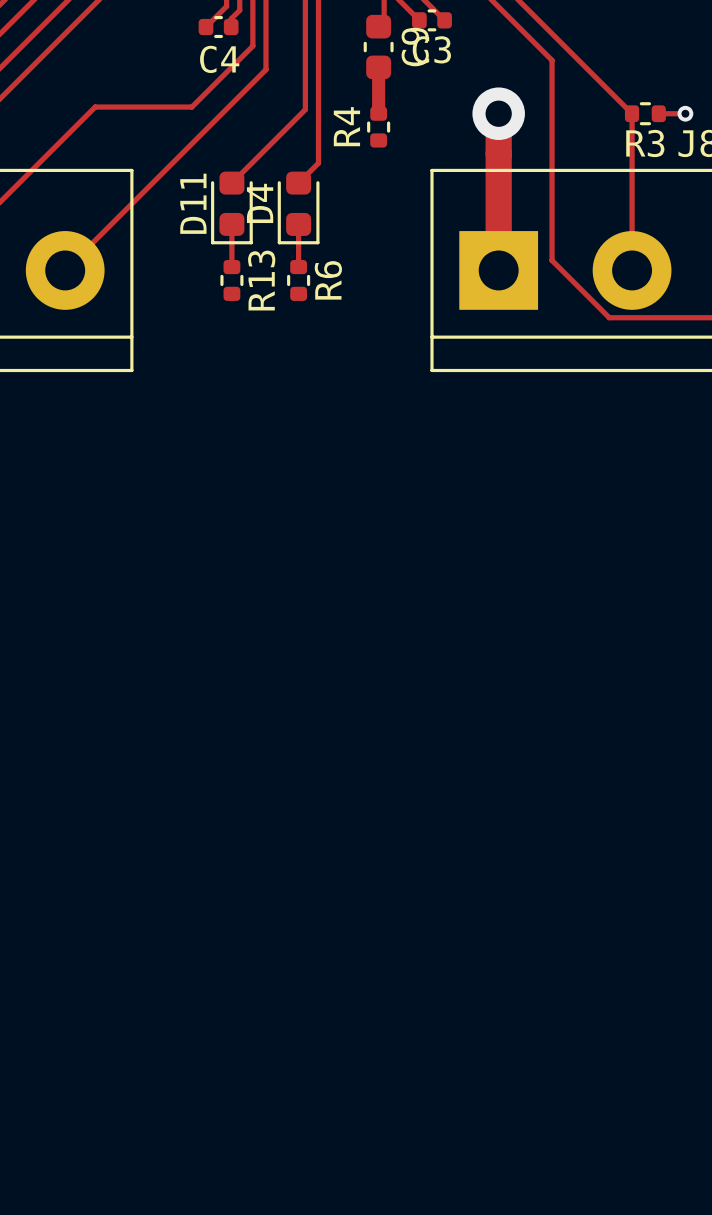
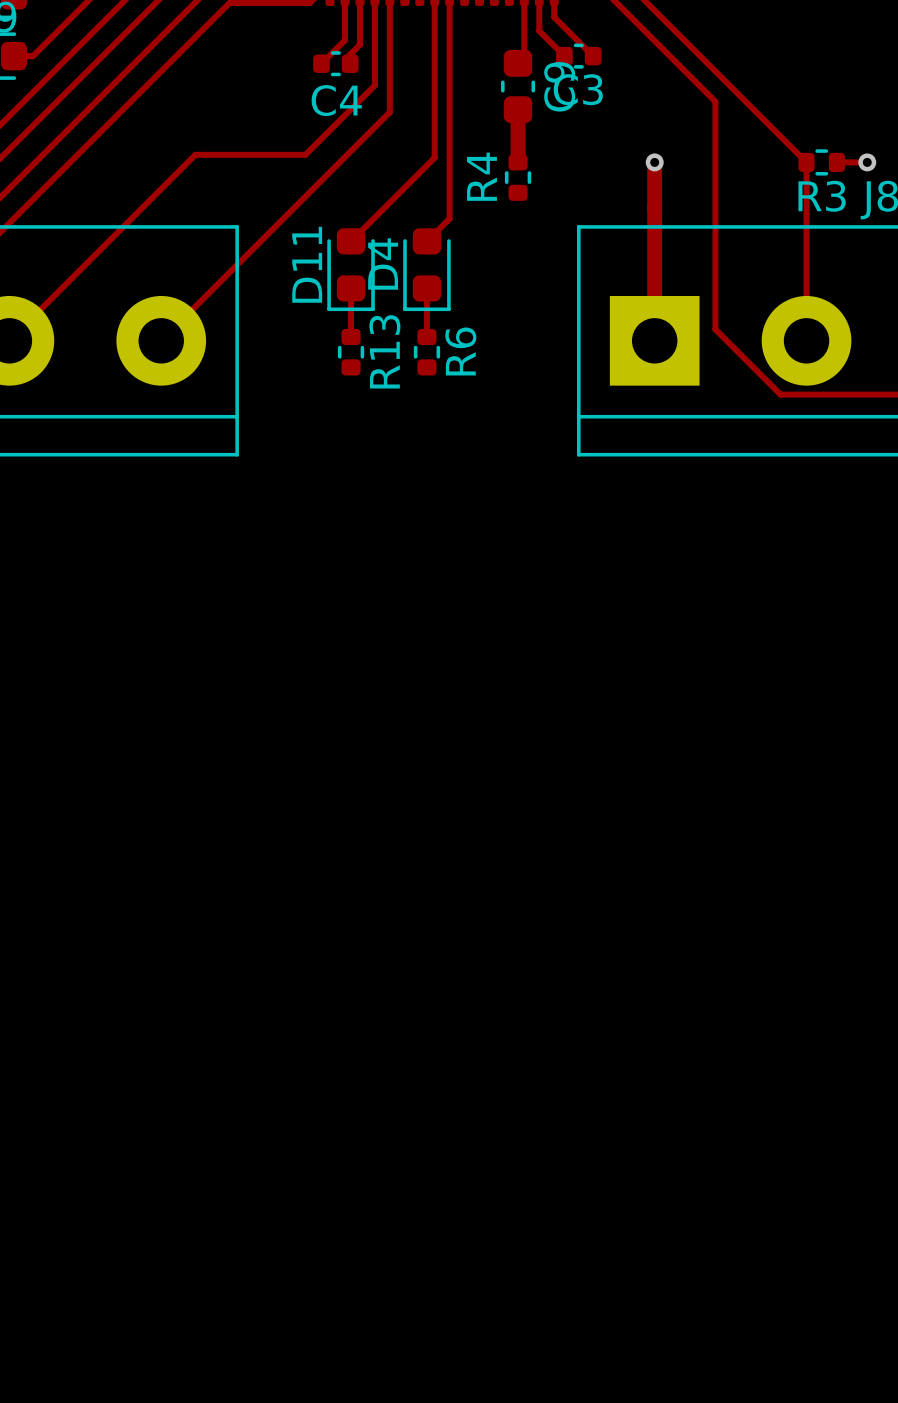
via size: [472, 87, 525, 140] -> [645, 153, 664, 172]
top track width: thick (498, 113) (498, 270) -> thin (654, 162) (654, 340)

